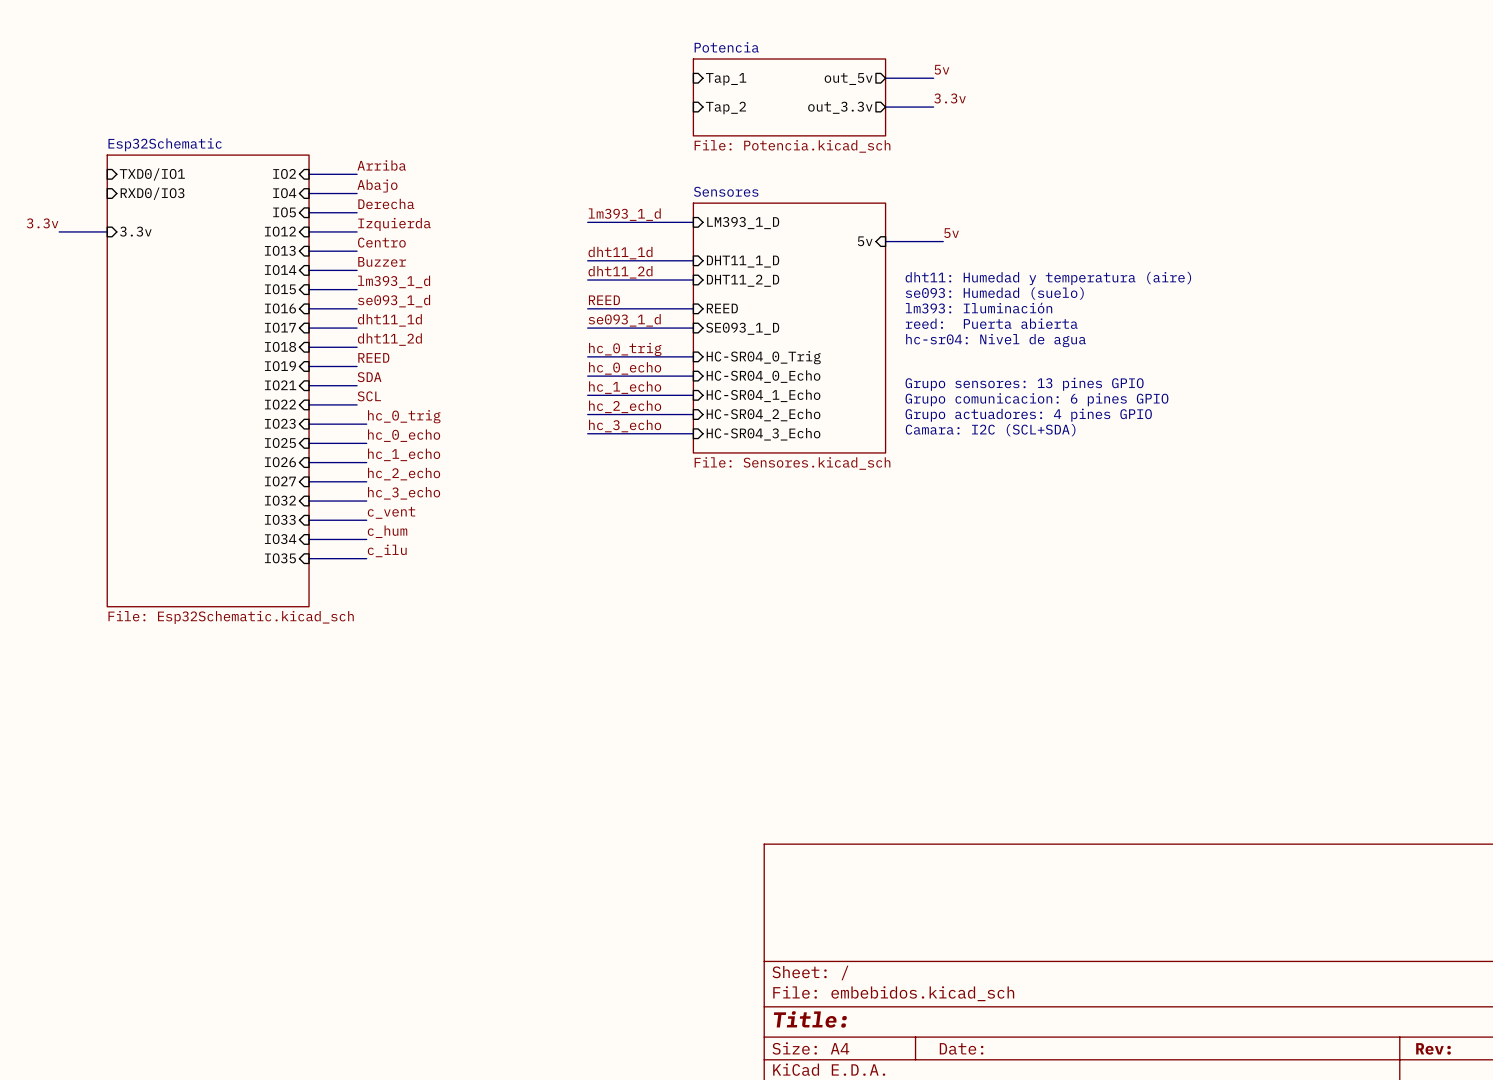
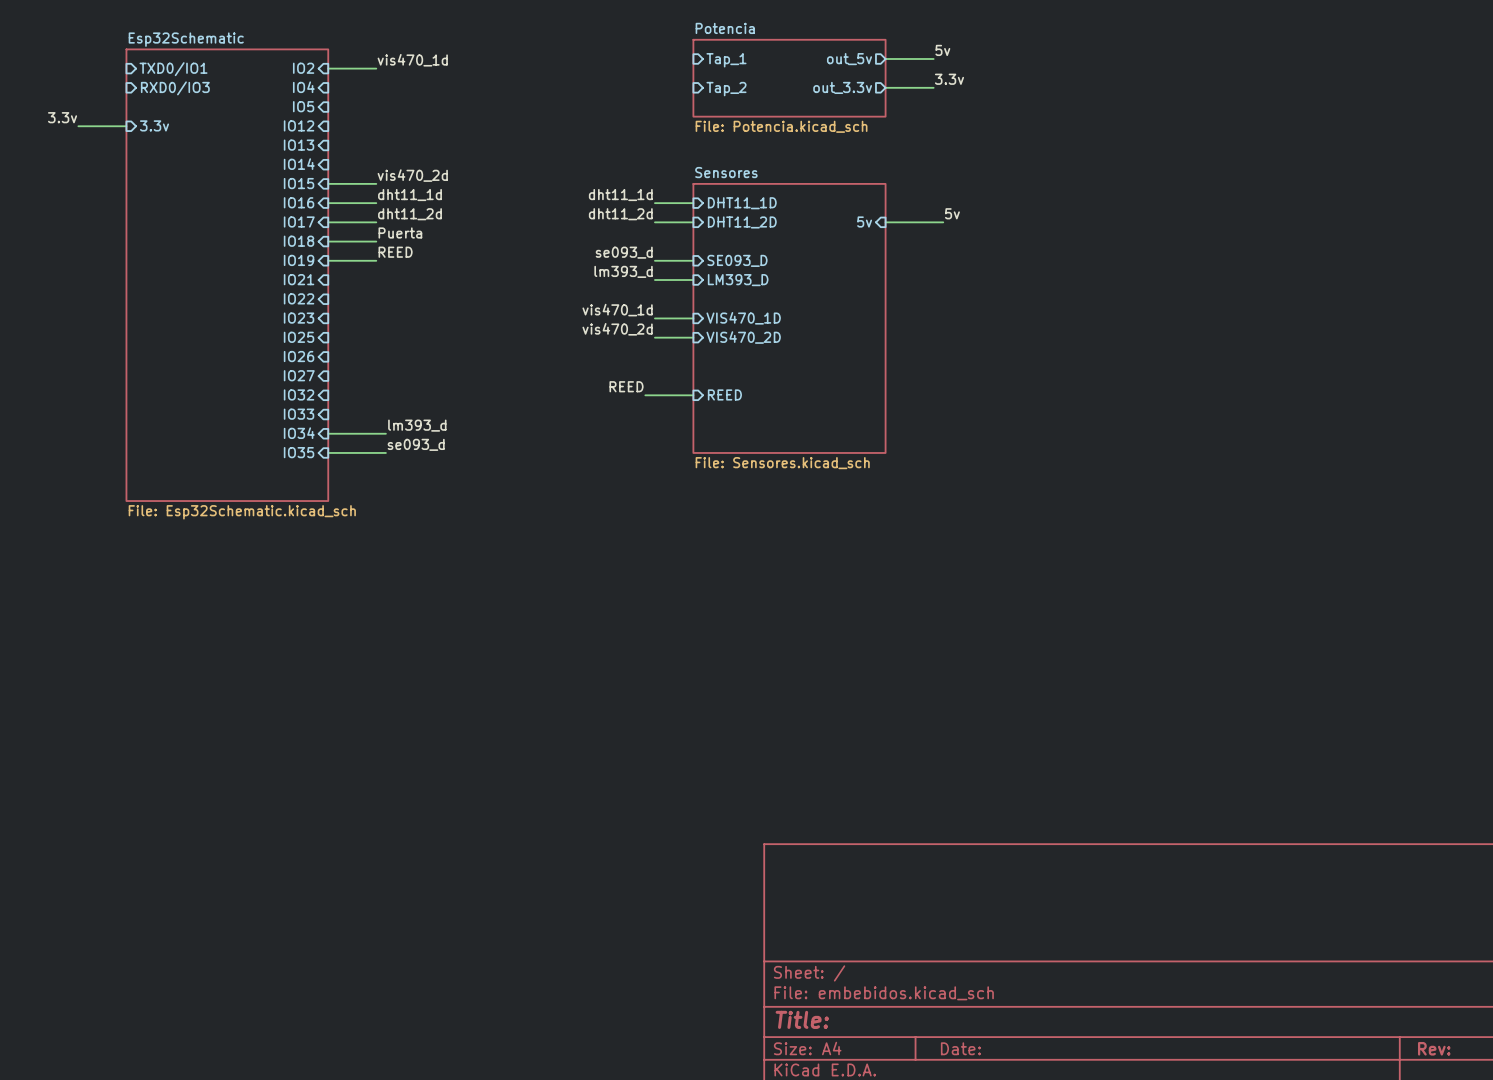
label: none -> vis470_1d (412, 60)
label position: 5v (941, 69) -> 5v (942, 50)
wire: (885, 78) (933, 78) -> (885, 58) (933, 58)
sheet pin position: Tap_1 (726, 79) -> Tap_1 (726, 60)
sheet pin position: out_5v (848, 79) -> out_5v (849, 59)
sheet Potencia position: (789, 97) -> (789, 78)
label position: 3.3v (950, 98) -> 3.3v (949, 79)
sheet pin position: Tap_2 (725, 107) -> Tap_2 (726, 89)
sheet pin position: out_3.3v (840, 107) -> out_3.3v (842, 87)
wire: (885, 107) (933, 107) -> (885, 87) (933, 87)
label: Arriba (381, 165) -> none
sheet pin position: IO2 (284, 173) -> IO2 (303, 68)
sheet pin position: TXD0/IO1 (152, 174) -> TXD0/IO1 (173, 69)
wire: (309, 174) (357, 174) -> (328, 68) (376, 68)
label: none -> vis470_2d (412, 175)
label: Abajo (377, 185) -> none
sheet pin position: RXD0/IO3 (152, 193) -> RXD0/IO3 (175, 88)
sheet pin position: IO4 (284, 193) -> IO4 (303, 87)
wire: (309, 193) (357, 193) -> none
label: none -> dht11_1d (409, 195)
label: Derecha (386, 203) -> none
wire: none -> (654, 203) (693, 203)
sheet pin: none -> DHT11_1D (742, 203)
sheet pin position: IO5 (284, 212) -> IO5 (303, 106)
wire: (309, 212) (357, 212) -> none
label: none -> dht11_2d (409, 214)
label: lm393_1_d (624, 214) -> none
wire: (587, 222) (654, 222) -> none
label position: 3.3v (42, 223) -> 3.3v (62, 117)
sheet pin: LM393_1_D (743, 223) -> DHT11_2D (742, 222)
label: Izquierda (394, 224) -> none
wire: (59, 231) (107, 231) -> (78, 126) (126, 126)
sheet pin position: 3.3v (135, 231) -> 3.3v (154, 125)
sheet pin position: IO12 (280, 231) -> IO12 (299, 125)
wire: (309, 231) (357, 231) -> none
label: none -> Puerta (400, 232)
label position: 5v (951, 233) -> 5v (952, 213)
sheet pin position: 5v (865, 241) -> 5v (864, 221)
wire: (885, 241) (943, 241) -> (885, 222) (943, 222)
label: Centro (381, 242) -> none
sheet pin position: IO13 (280, 250) -> IO13 (299, 145)
wire: (309, 251) (357, 251) -> none
label position: dht11_1d (620, 253) -> dht11_1d (620, 195)
label: none -> se093_d (624, 252)
wire: (587, 260) (654, 260) -> none
label: Buzzer (382, 261) -> none
sheet pin: DHT11_1_D (743, 261) -> SE093_D (737, 260)
sheet pin position: IO14 (280, 270) -> IO14 (299, 164)
wire: (309, 270) (357, 270) -> none
label position: dht11_2d (620, 272) -> dht11_2d (620, 214)
label: none -> lm393_d (623, 271)
text: dht11: Humedad y temperatura (aire) (1048, 278) -> none
wire: (587, 280) (654, 280) -> none
sheet pin: DHT11_2_D (743, 280) -> LM393_D (738, 280)
label: lm393_1_d (394, 281) -> none
sheet pin position: IO15 (280, 289) -> IO15 (299, 183)
wire: (309, 289) (357, 289) -> (328, 183) (376, 183)
text: se093: Humedad (suelo) (994, 293) -> none
label position: REED (604, 300) -> REED (626, 386)
label: se093_1_d (394, 301) -> none
text: lm393: Iluminación (979, 307) -> none
sheet pin position: IO16 (280, 308) -> IO16 (299, 202)
wire: (309, 308) (357, 308) -> (328, 203) (376, 203)
wire: (587, 308) (693, 308) -> none
sheet pin: REED (722, 308) -> none
label: none -> vis470_1d (617, 310)
wire: none -> (654, 318) (693, 318)
sheet Sensores: none -> File: Sensores.kicad_sch (789, 318)
sheet pin: none -> VIS470_1D (743, 318)
label: dht11_1d (389, 320) -> none
label: se093_1_d (624, 320) -> none
text: reed: Puerta abierta (991, 323) -> none
sheet pin position: IO17 (280, 327) -> IO17 (299, 221)
wire: (309, 328) (357, 328) -> (328, 222) (376, 222)
wire: (587, 328) (693, 328) -> none
sheet pin: SE093_1_D (742, 328) -> none
sheet Sensores: File: Sensores.kicad_sch (789, 328) -> none
label: none -> vis470_2d (617, 329)
wire: none -> (654, 337) (693, 337)
sheet pin: none -> VIS470_2D (743, 337)
label: dht11_2d (389, 339) -> none
text: hc-sr04: Nivel de agua (995, 340) -> none
sheet pin position: IO18 (280, 346) -> IO18 (299, 241)
wire: (309, 347) (357, 347) -> (328, 241) (376, 241)
label: hc_0_trig (625, 349) -> none
wire: (587, 356) (693, 356) -> none
label position: REED (373, 357) -> REED (395, 252)
sheet pin: HC-SR04_0_Trig (763, 357) -> none
sheet pin position: IO19 (280, 366) -> IO19 (299, 260)
wire: (309, 366) (357, 366) -> (328, 260) (376, 260)
label: hc_0_echo (625, 368) -> none
wire: (587, 376) (693, 376) -> none
sheet pin: HC-SR04_0_Echo (763, 376) -> none
label: SDA (369, 377) -> none
sheet Esp32Schematic position: (208, 380) -> (227, 275)
text: Grupo sensores: 13 pines GPIO (1024, 384) -> none
sheet pin position: IO21 (280, 385) -> IO21 (299, 279)
wire: (309, 385) (357, 385) -> none
label: hc_1_echo (625, 387) -> none
wire: (587, 395) (645, 395) -> none
sheet pin: HC-SR04_1_Echo (763, 395) -> REED (724, 394)
label: SCL (369, 396) -> none
text: Grupo comunicacion: 6 pines GPIO (1036, 399) -> none
sheet pin position: IO22 (280, 404) -> IO22 (299, 298)
wire: (309, 404) (357, 404) -> none
label: hc_2_echo (625, 406) -> none
wire: (587, 414) (693, 414) -> none
sheet pin: HC-SR04_2_Echo (763, 415) -> none
text: Grupo actuadores: 4 pines GPIO (1028, 415) -> none
label: hc_0_trig (404, 416) -> none
sheet pin position: IO23 (280, 423) -> IO23 (299, 318)
wire: (309, 424) (366, 424) -> none
label: none -> lm393_d (417, 425)
label: hc_3_echo (625, 426) -> none
text: Camara: I2C (SCL+SDA) (990, 430) -> none
wire: (587, 433) (693, 433) -> none
sheet pin: HC-SR04_3_Echo (763, 434) -> none
label: hc_0_echo (404, 435) -> none
sheet pin position: IO25 (280, 443) -> IO25 (299, 337)
wire: (309, 443) (366, 443) -> none
label: none -> se093_d (416, 444)
label: hc_1_echo (404, 454) -> none
sheet pin position: IO26 (280, 462) -> IO26 (299, 356)
wire: (309, 462) (366, 462) -> none
label: hc_2_echo (404, 474) -> none
sheet pin position: IO27 (280, 481) -> IO27 (299, 375)
wire: (309, 481) (366, 481) -> none
label: hc_3_echo (404, 493) -> none
sheet pin position: IO32 (280, 500) -> IO32 (299, 394)
wire: (309, 501) (366, 501) -> none
label: c_vent (391, 512) -> none
sheet pin position: IO33 (280, 519) -> IO33 (299, 414)
wire: (309, 520) (366, 520) -> none
label: c_hum (387, 531) -> none
sheet pin position: IO34 (280, 539) -> IO34 (299, 433)
wire: (309, 539) (366, 539) -> (328, 433) (385, 433)
label: c_ilu (387, 550) -> none
sheet pin position: IO35 (280, 558) -> IO35 (299, 452)
wire: (309, 558) (366, 558) -> (328, 452) (385, 452)

